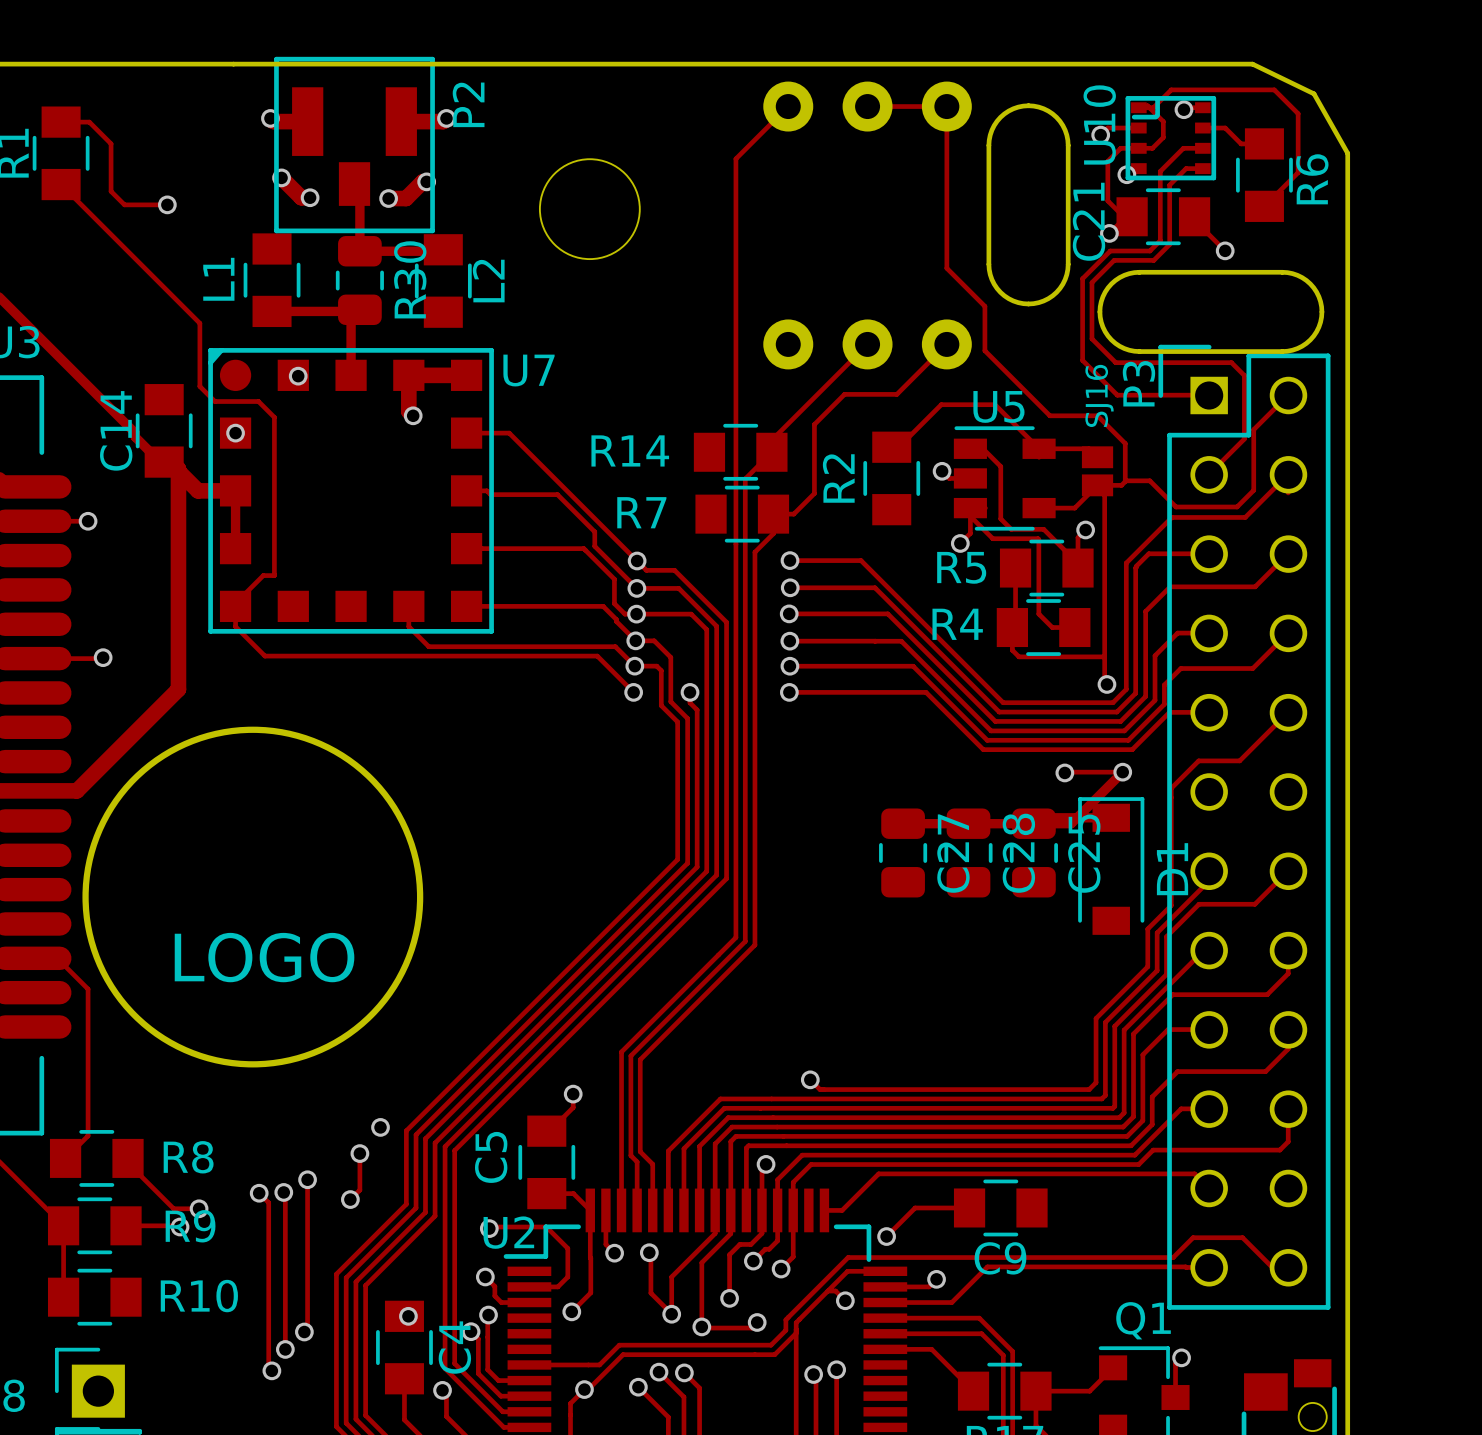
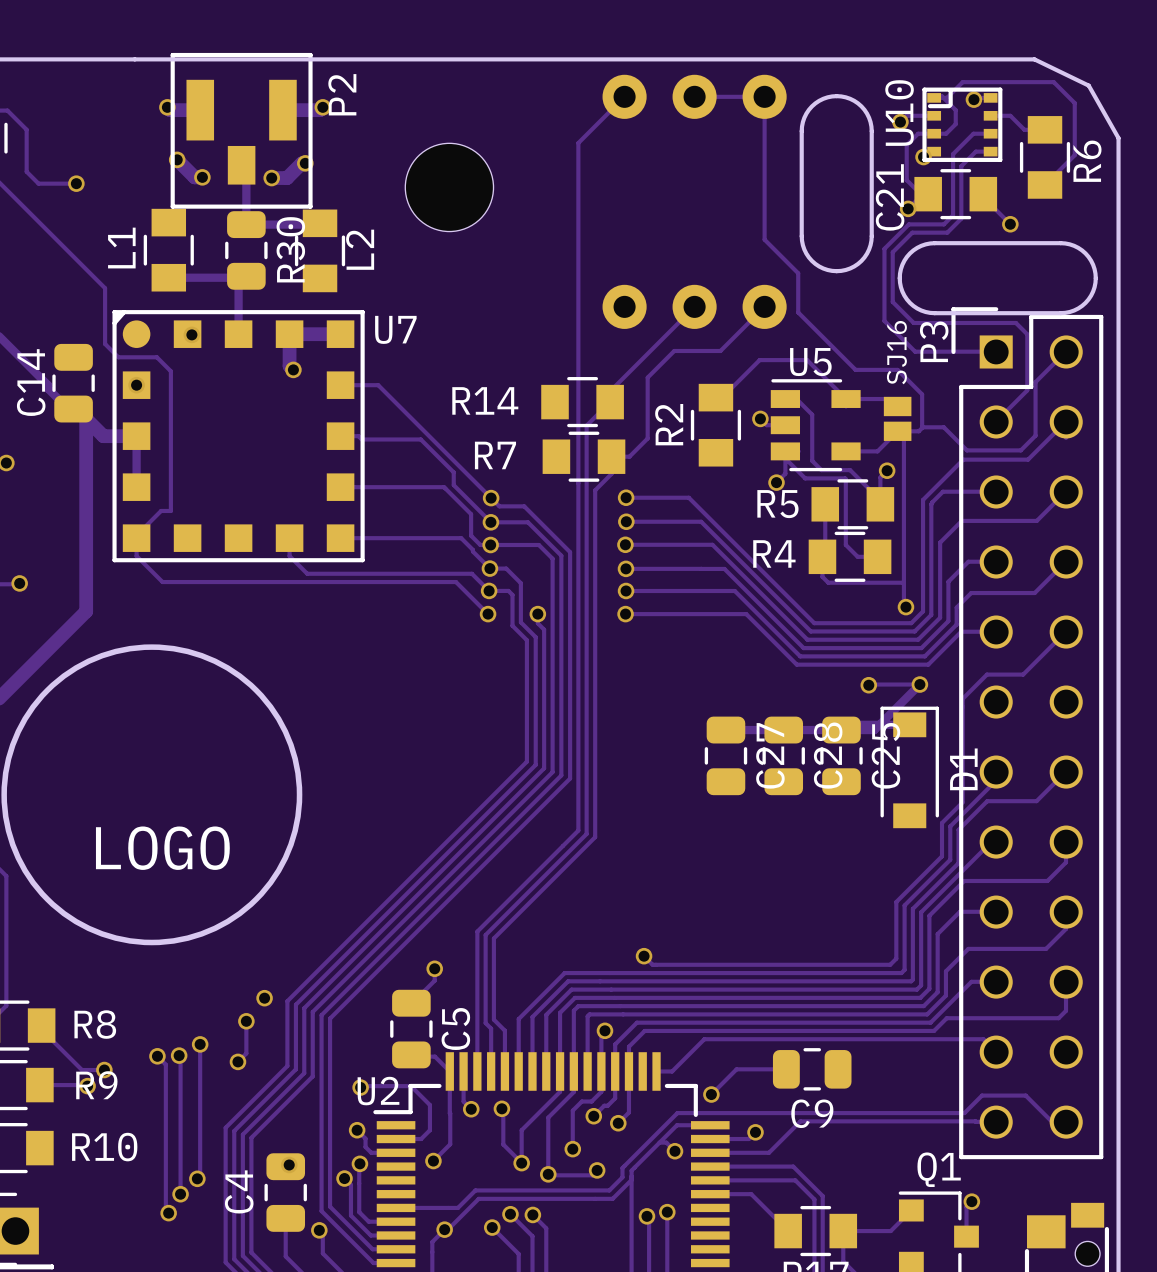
C14 footprint: [135, 384, 193, 478] -> [52, 343, 95, 423]
C5 footprint: [518, 1115, 576, 1210] -> [390, 989, 433, 1069]
C5 name position: C5 (491, 1157) -> C5 (455, 1029)
C9 footprint: [953, 1179, 1048, 1237] -> [772, 1048, 852, 1091]
C4 footprint: [376, 1300, 433, 1395] -> [264, 1153, 307, 1232]
C4 name position: C4 (454, 1347) -> C4 (239, 1191)

